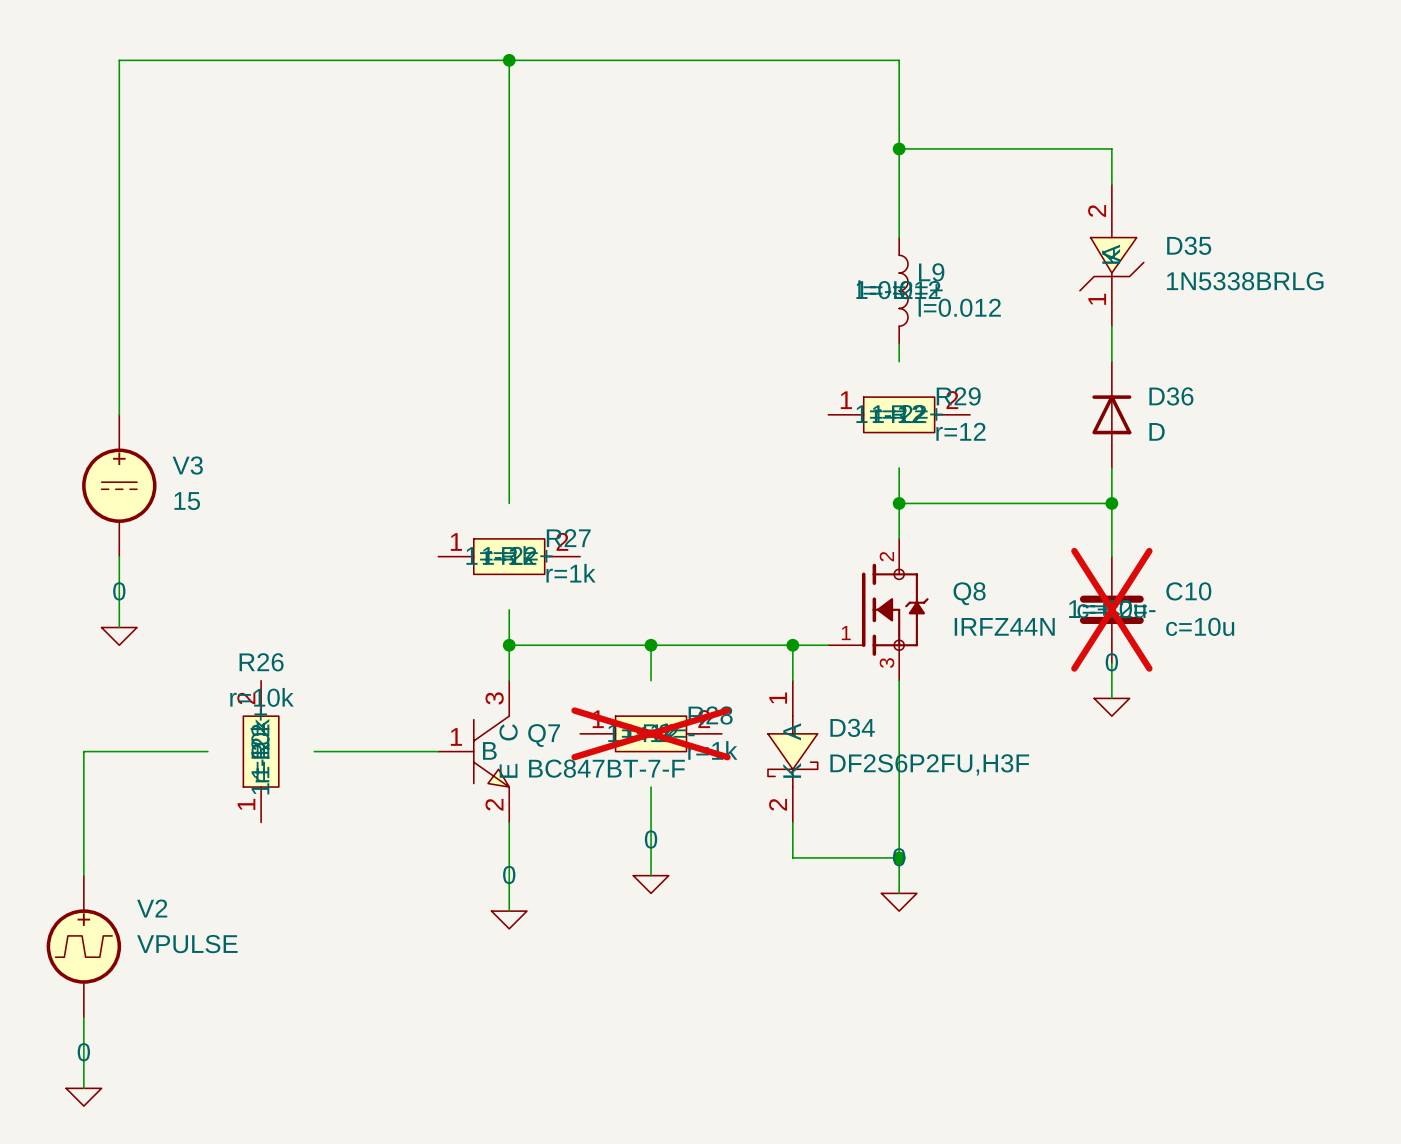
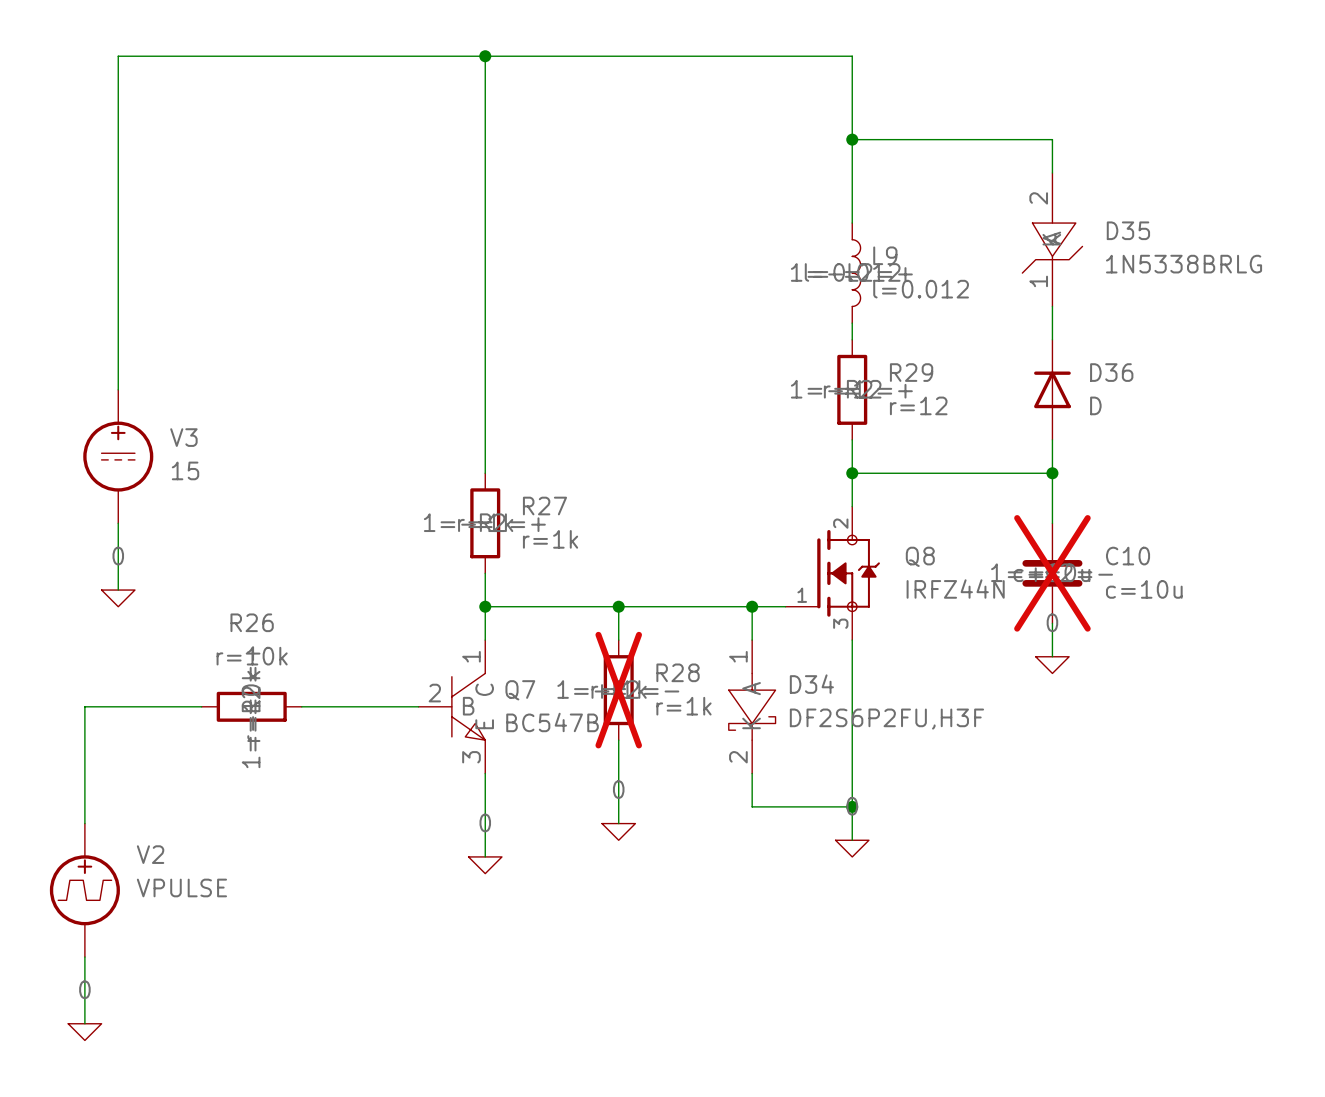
R29 symbol: [828, 397, 971, 433] -> [837, 339, 868, 440]
R27 symbol: [438, 538, 581, 575] -> [470, 473, 501, 574]
R26 symbol: [243, 680, 279, 823] -> [201, 691, 302, 722]
Q7 pin number: 3 (494, 698) -> 1 (471, 656)
R28 symbol: [580, 716, 722, 752] -> [603, 640, 634, 741]
Q7 pin number: 1 (456, 736) -> 2 (434, 693)
Q7 value: BC847BT-7-F (606, 768) -> BC547B (552, 722)
Q7 pin number: 2 (494, 804) -> 3 (471, 757)

